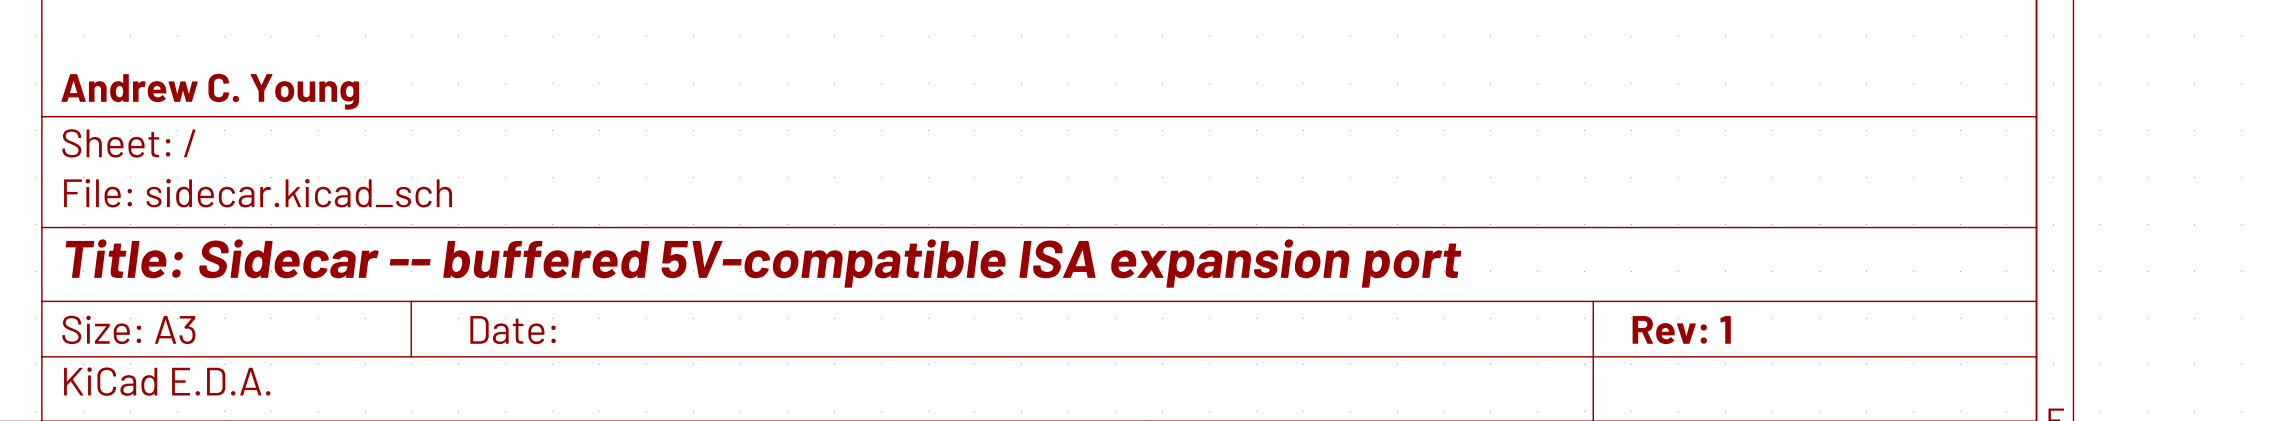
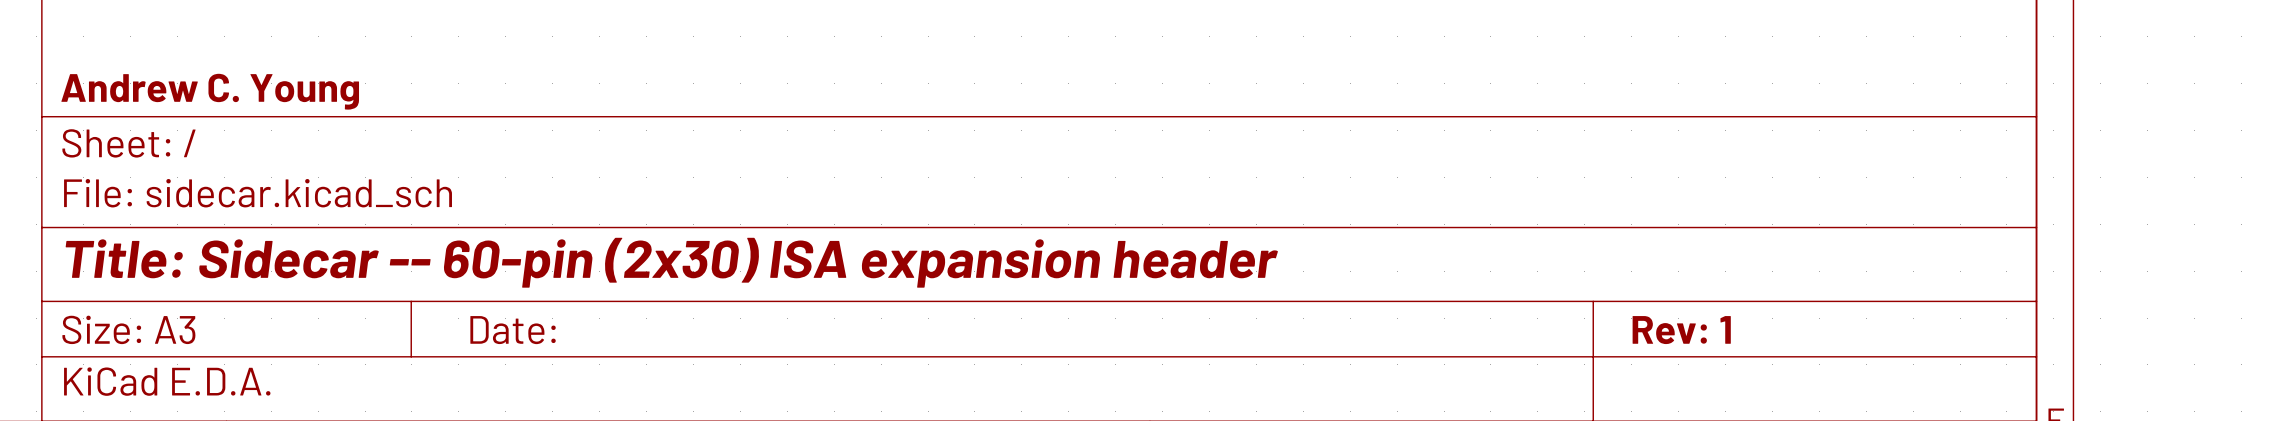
title block: Title: Sidecar -- buffered 5V-compatible ISA expansion port (763, 263) -> Title: Sidecar -- 60-pin (2x30) ISA expansion header (671, 262)

